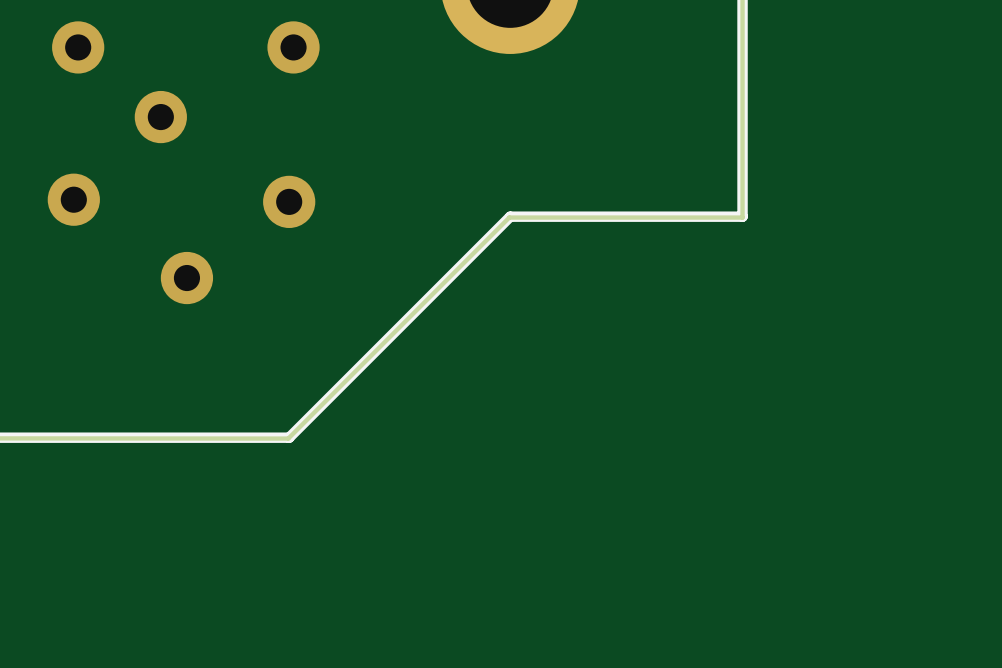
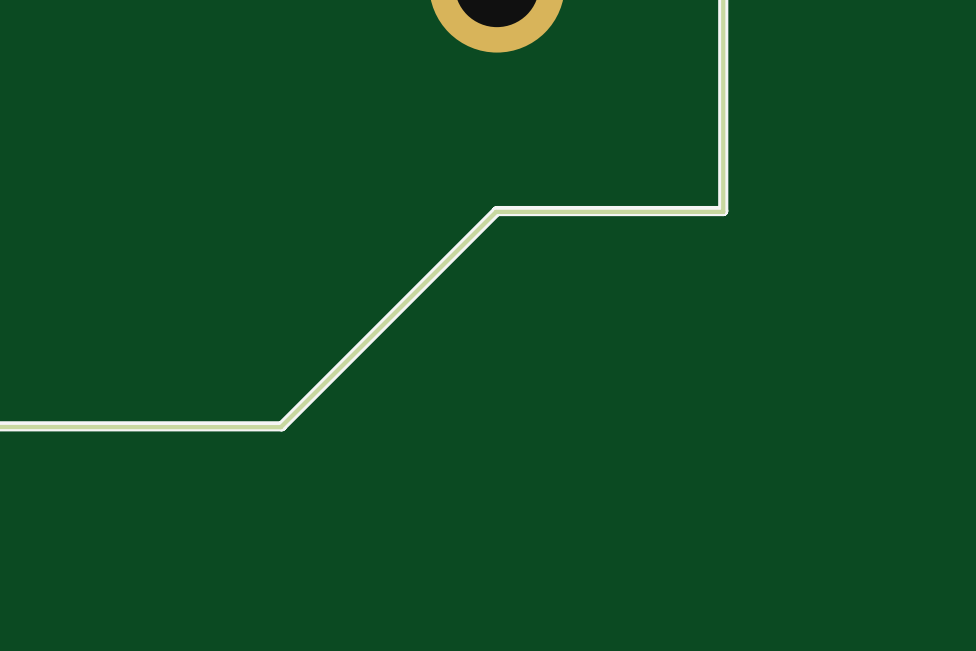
via: (78, 47) -> none
via: (293, 47) -> none
via: (160, 117) -> none
via: (73, 199) -> none
via: (289, 201) -> none
via: (186, 278) -> none

